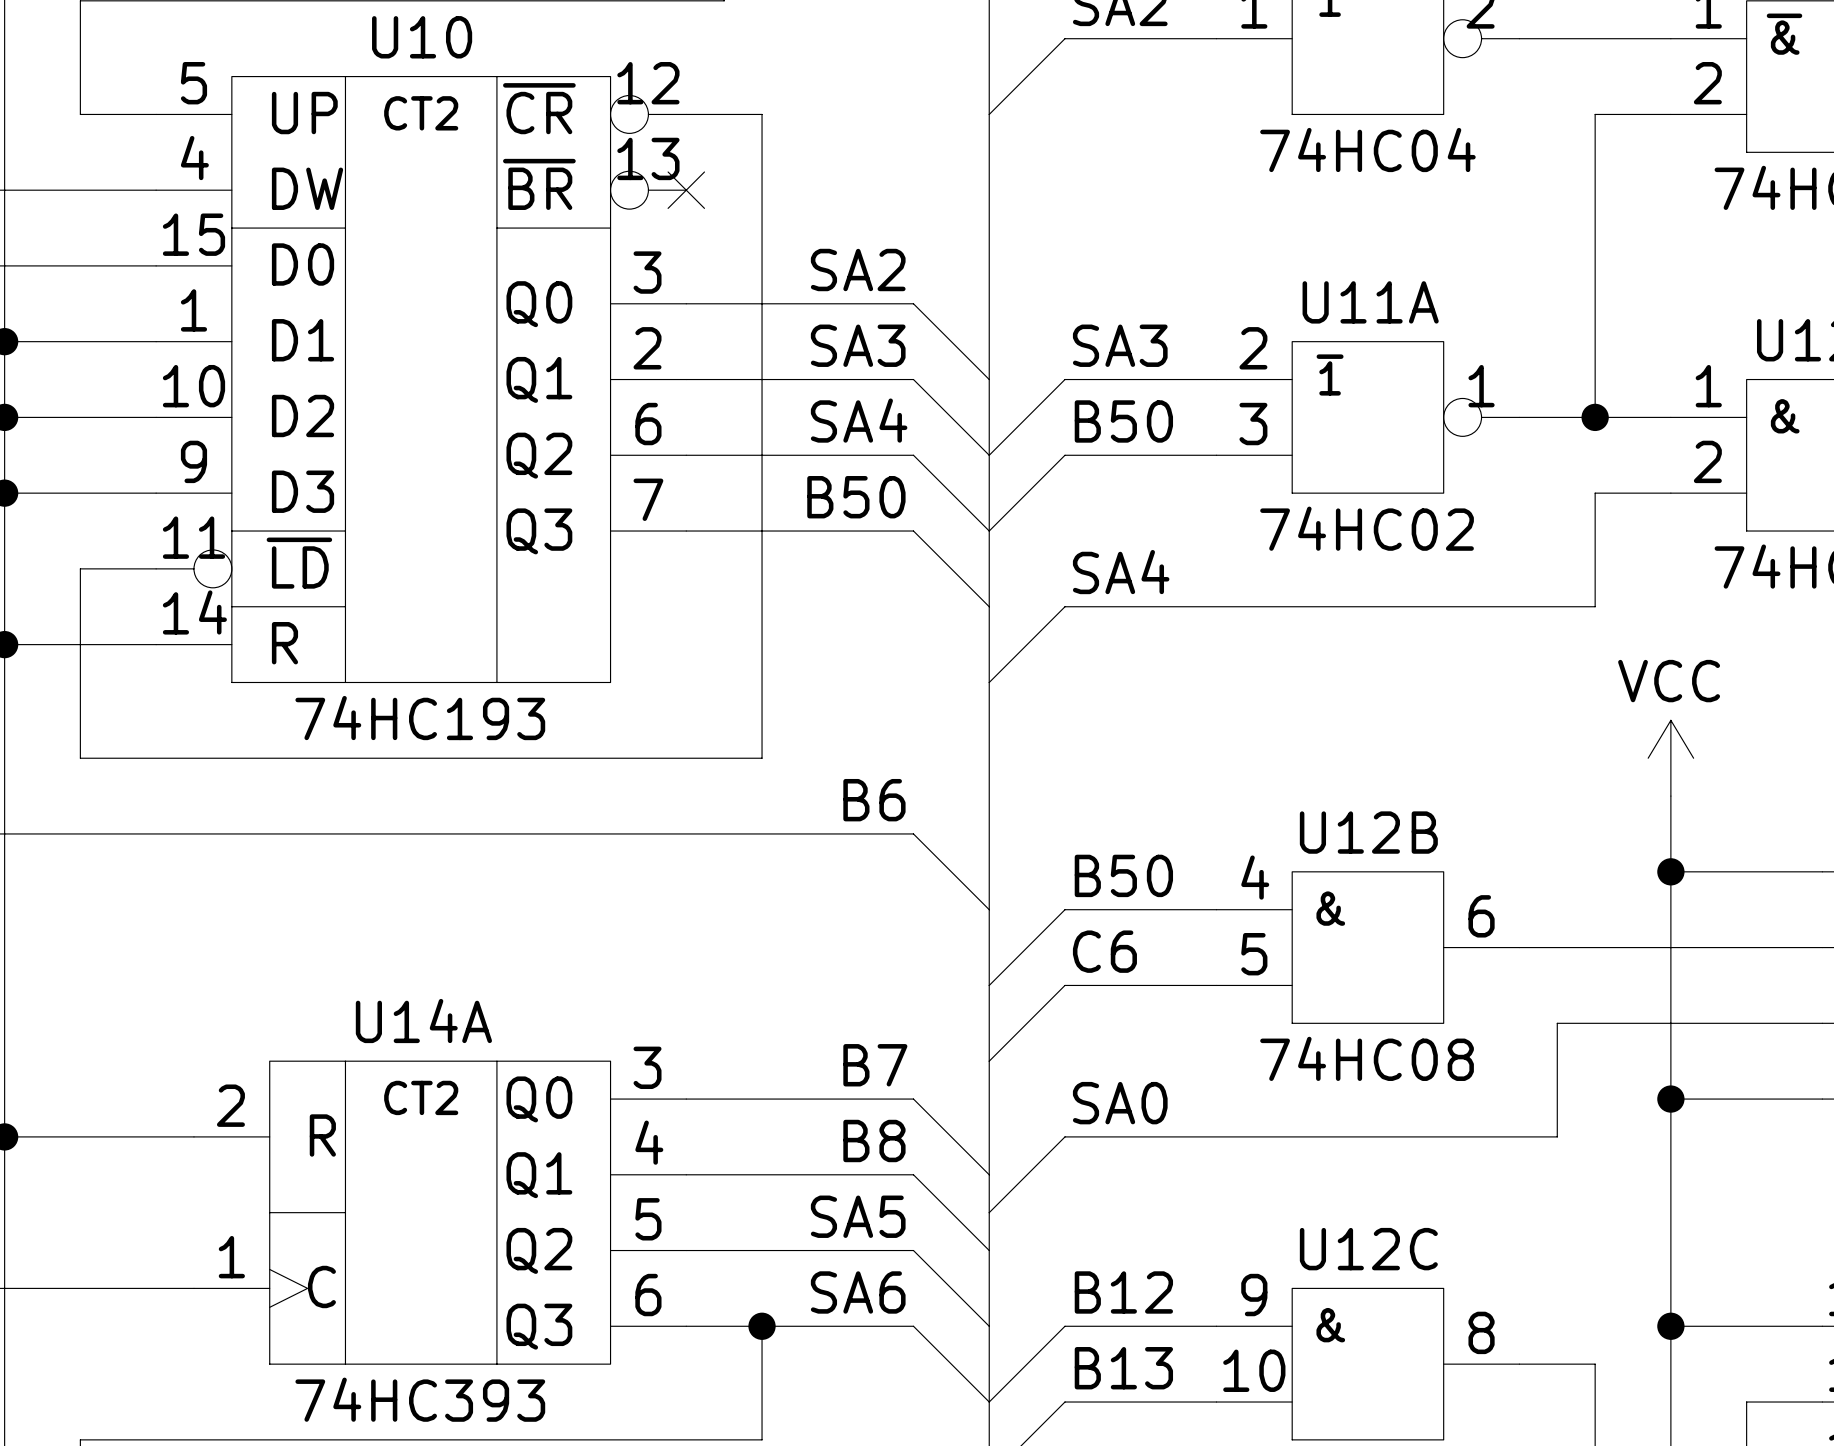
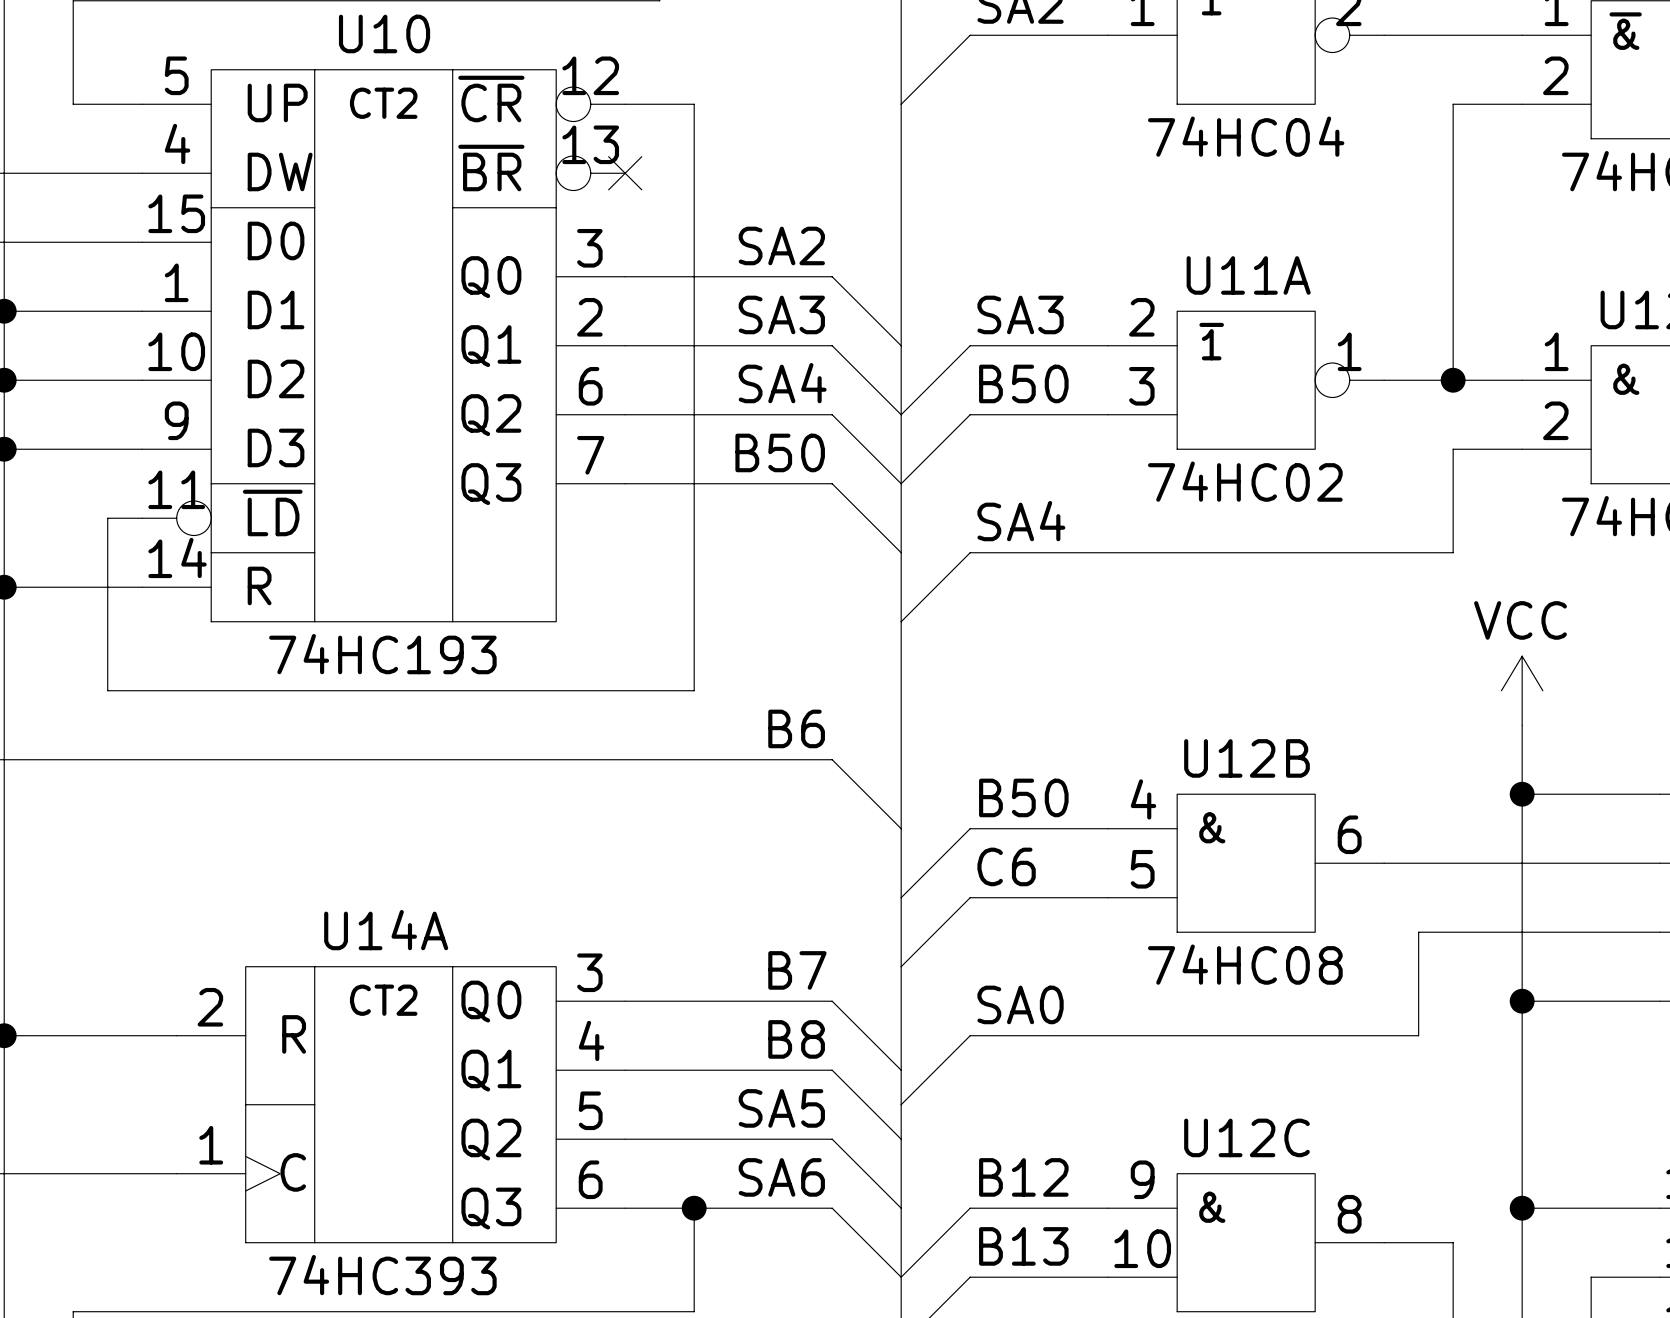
wire: (118, 568) (80, 568) (80, 758) (118, 758) -> (107, 518) (107, 690)

